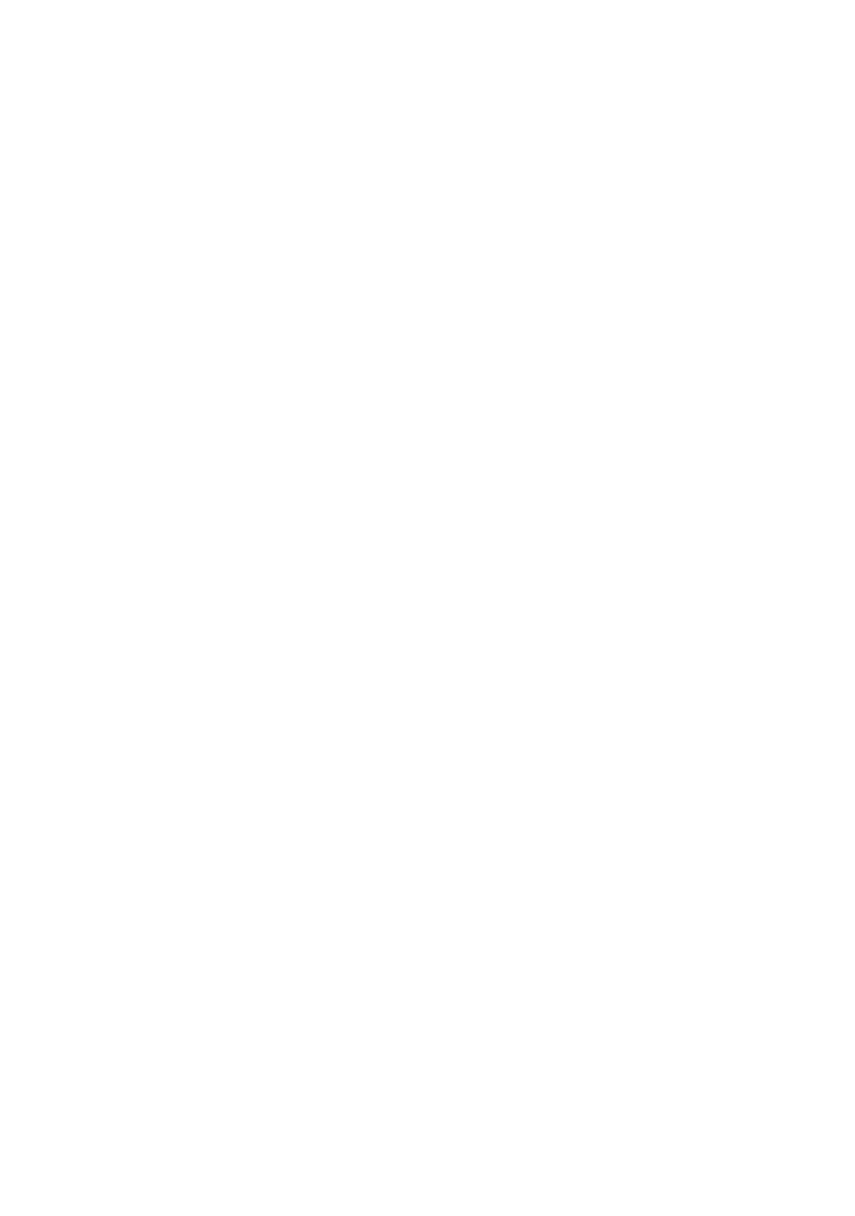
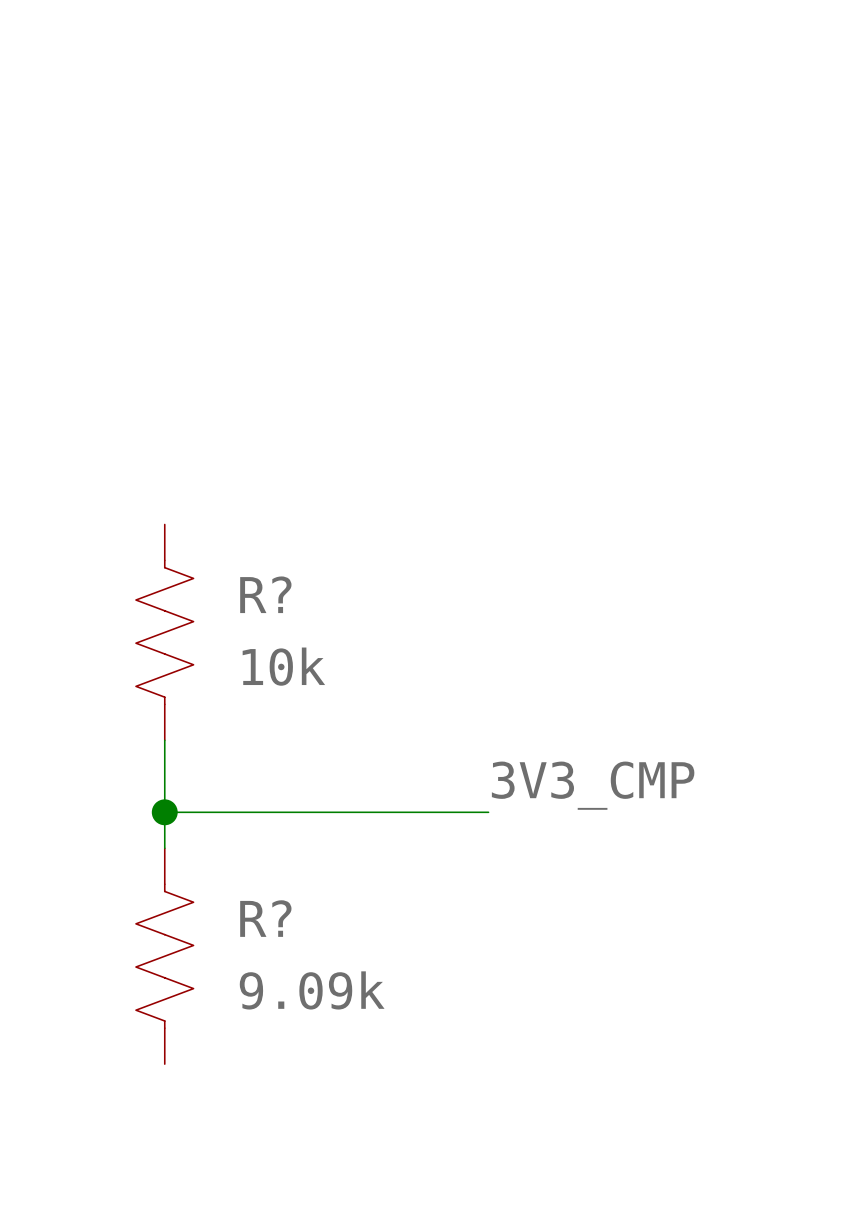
R?: none -> 10k (164, 632)
wire: none -> (164, 740) (164, 848)
label: none -> 3V3_CMP (593, 785)
wire: none -> (164, 812) (488, 812)
junction: none -> (164, 812)
R?: none -> 9.09k (164, 956)

